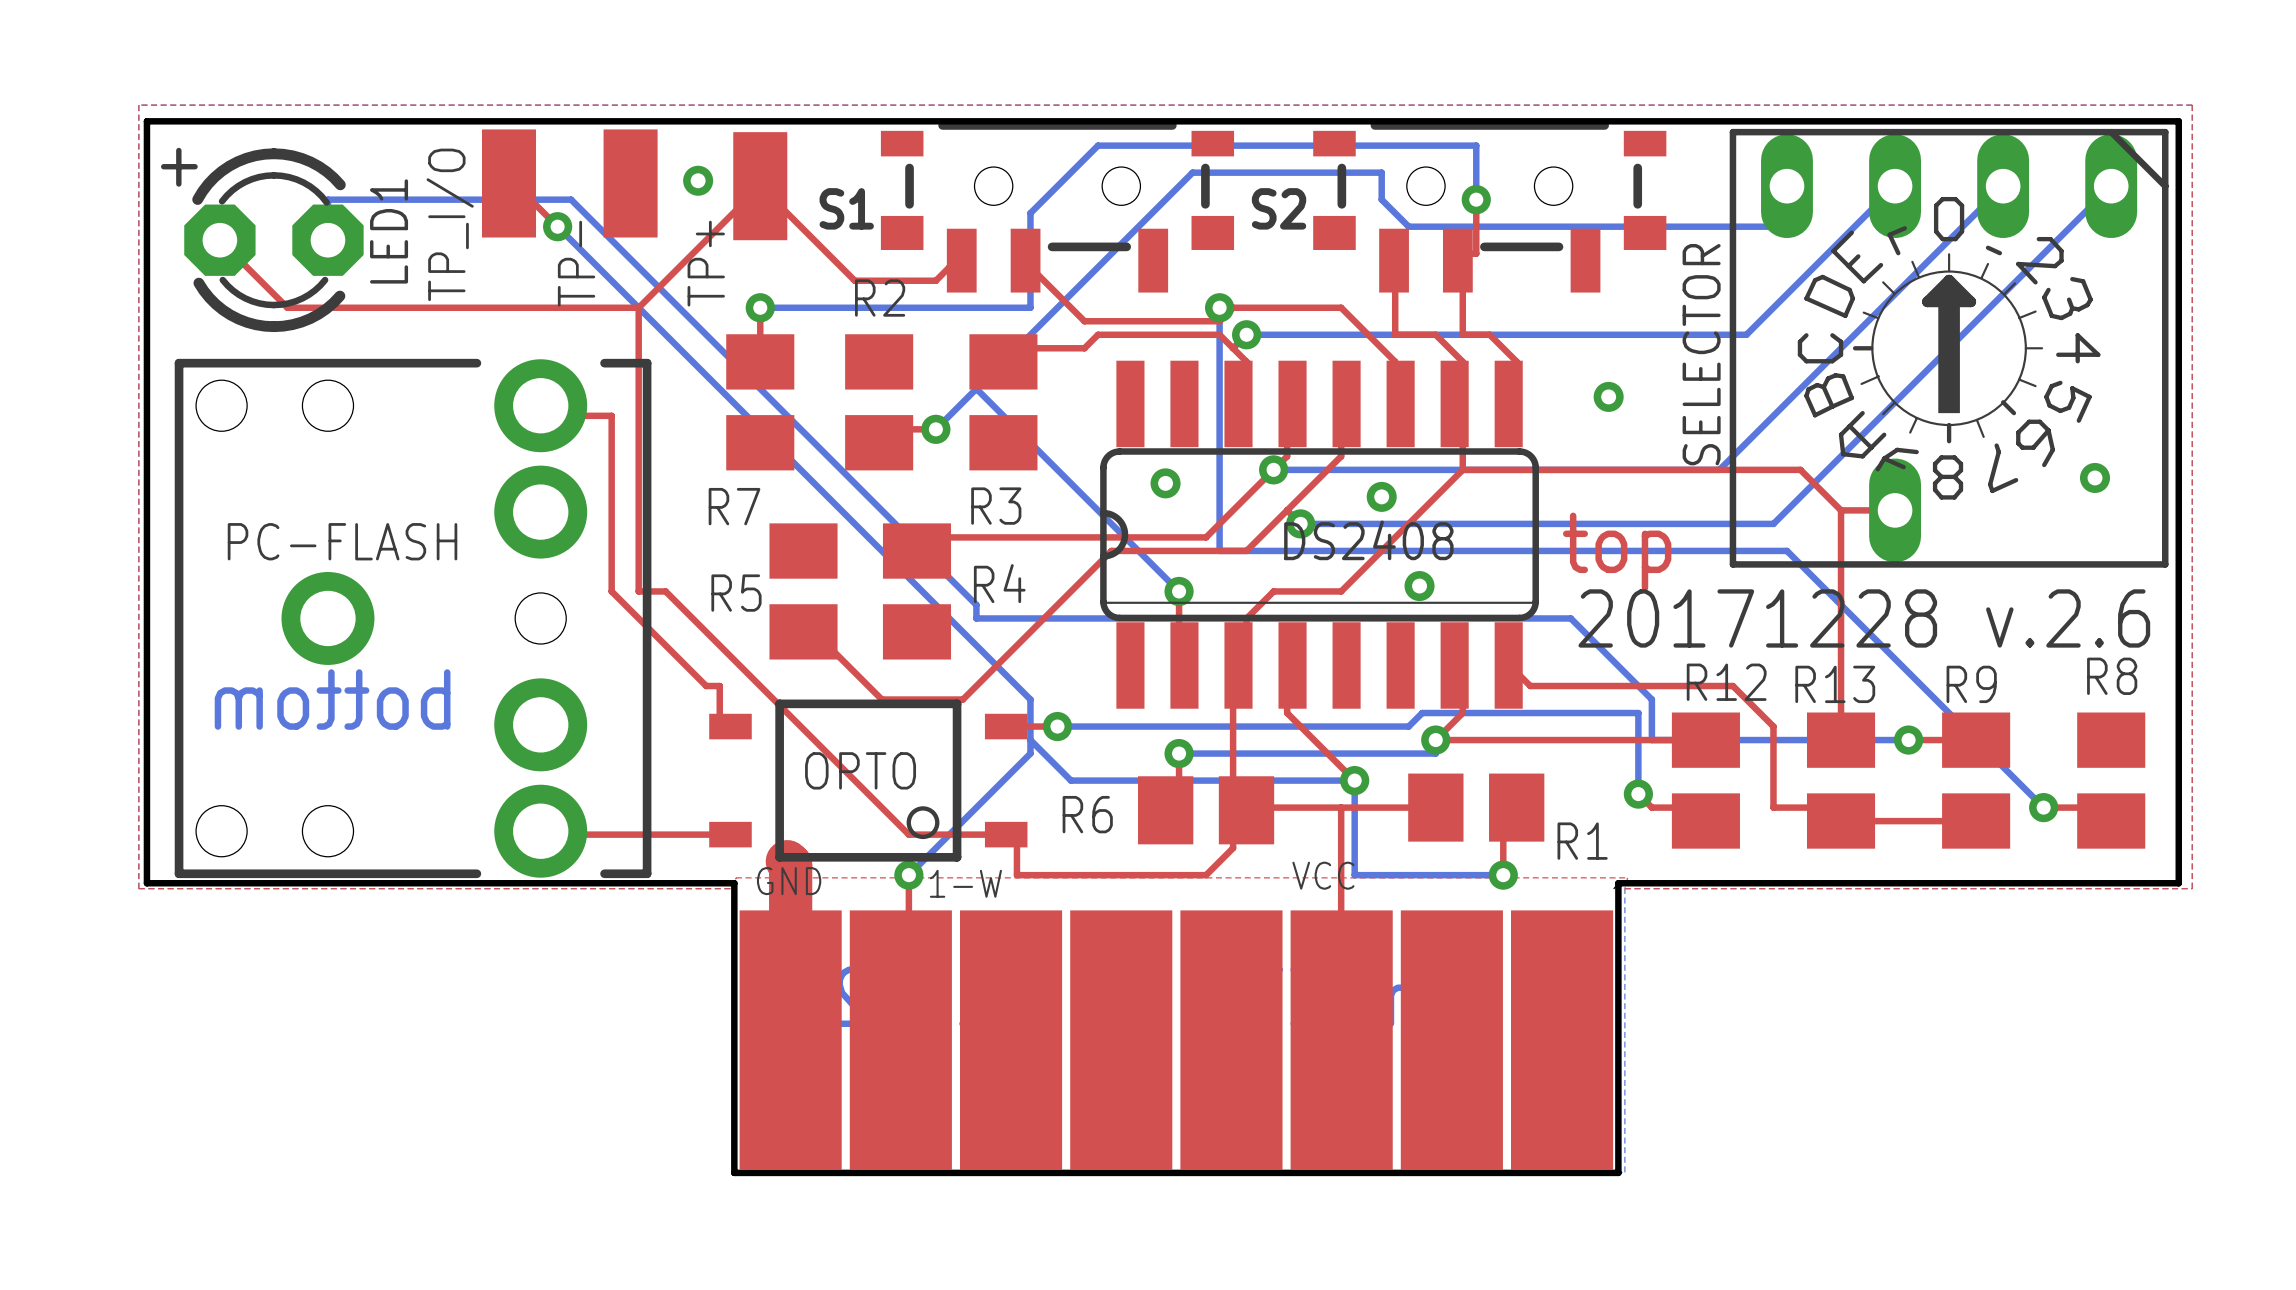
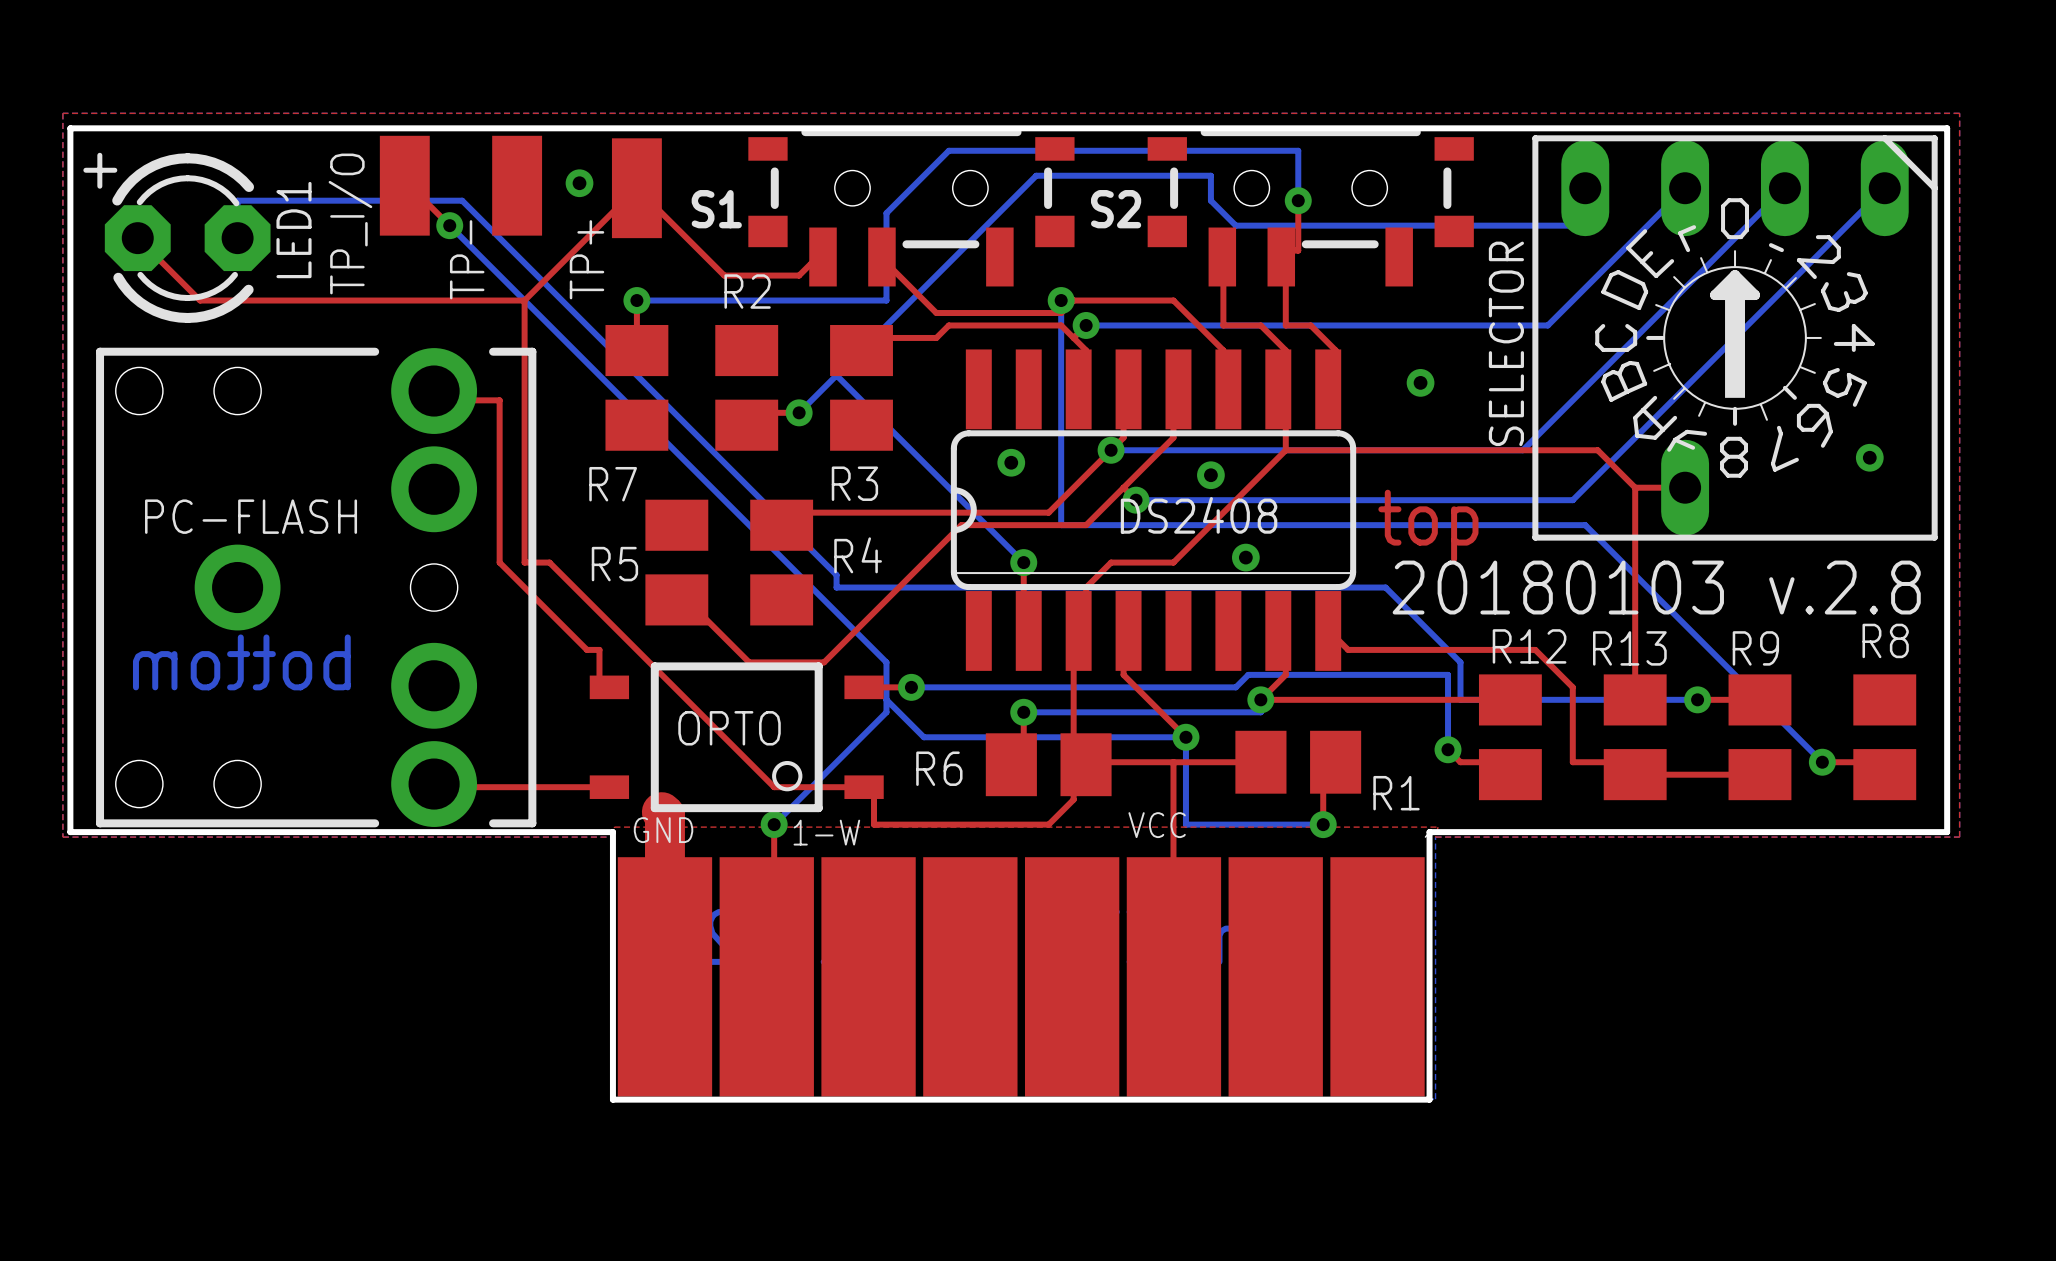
text: 20171228 v.2.6 (1864, 618) -> 20180103 v.2.8 (1656, 587)

